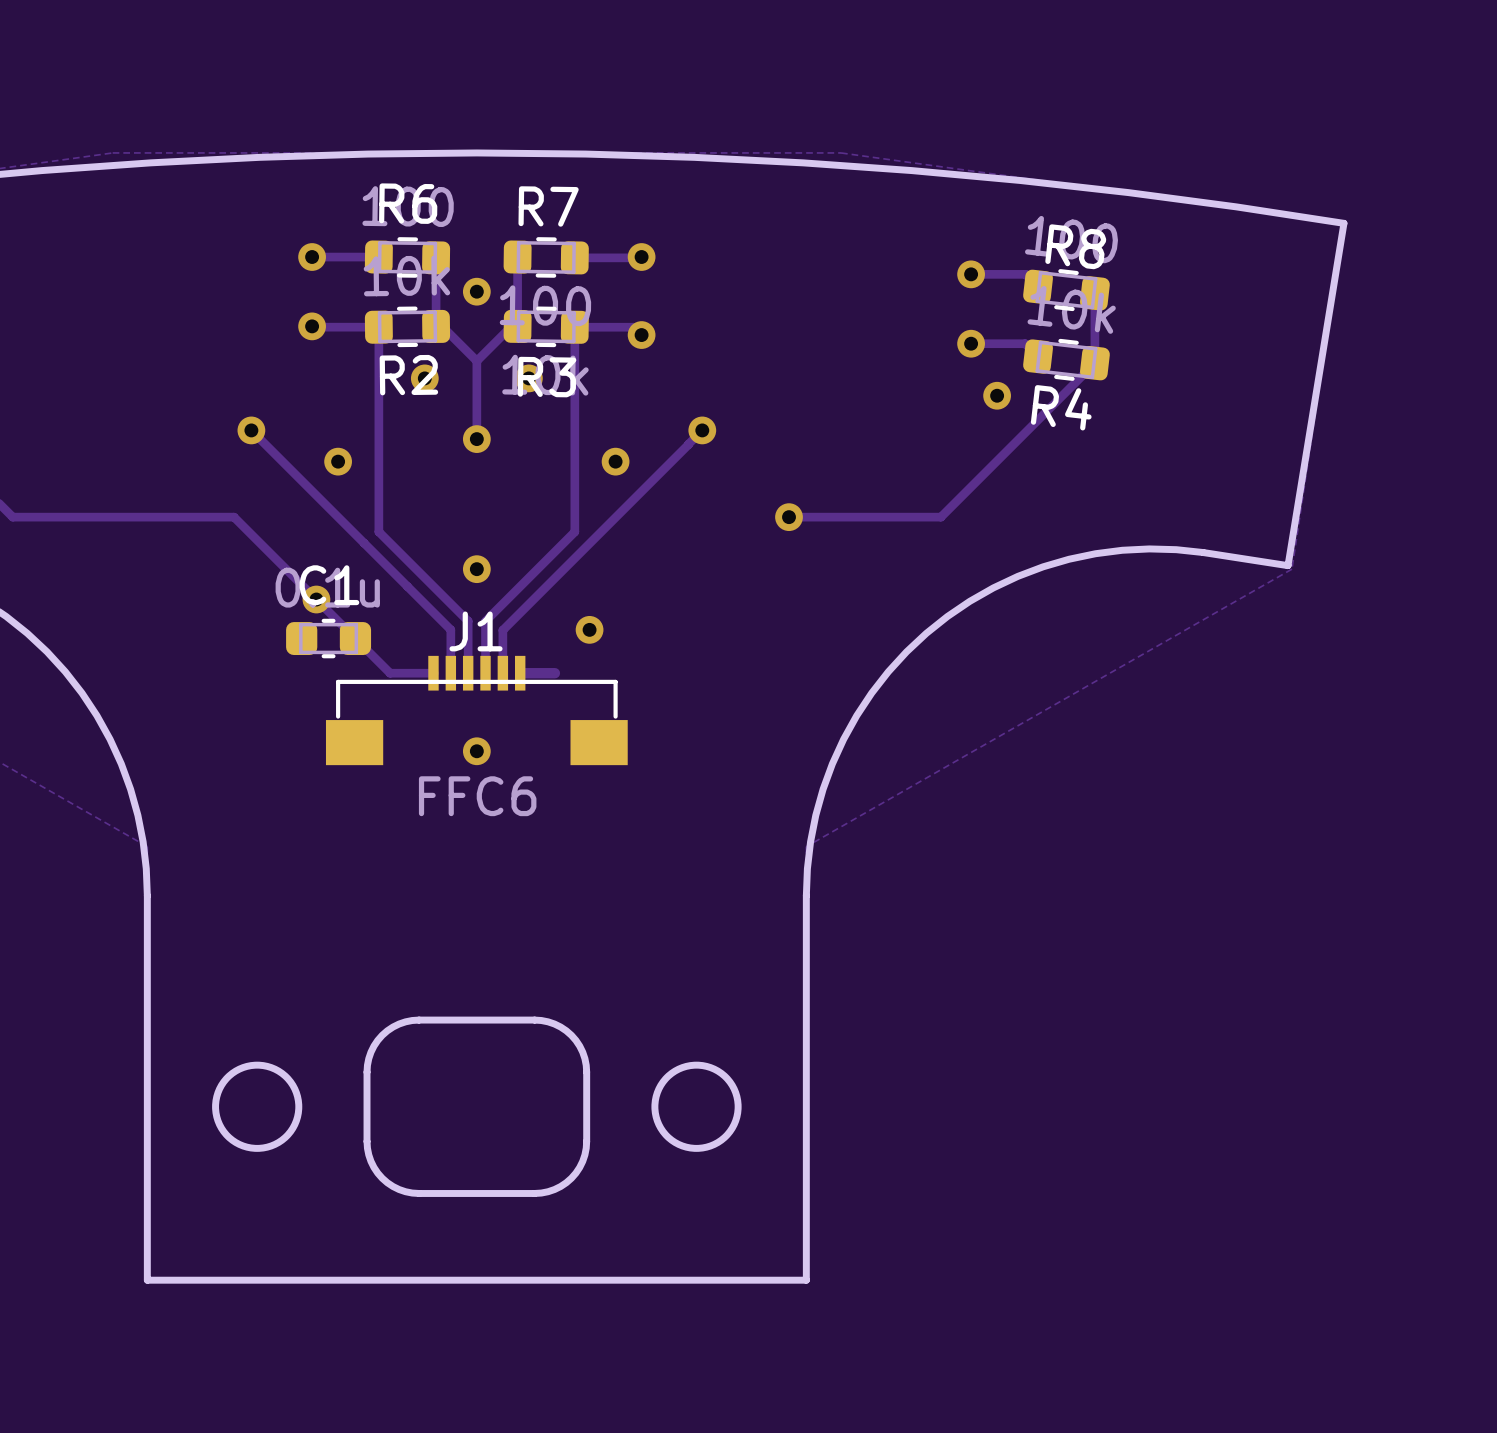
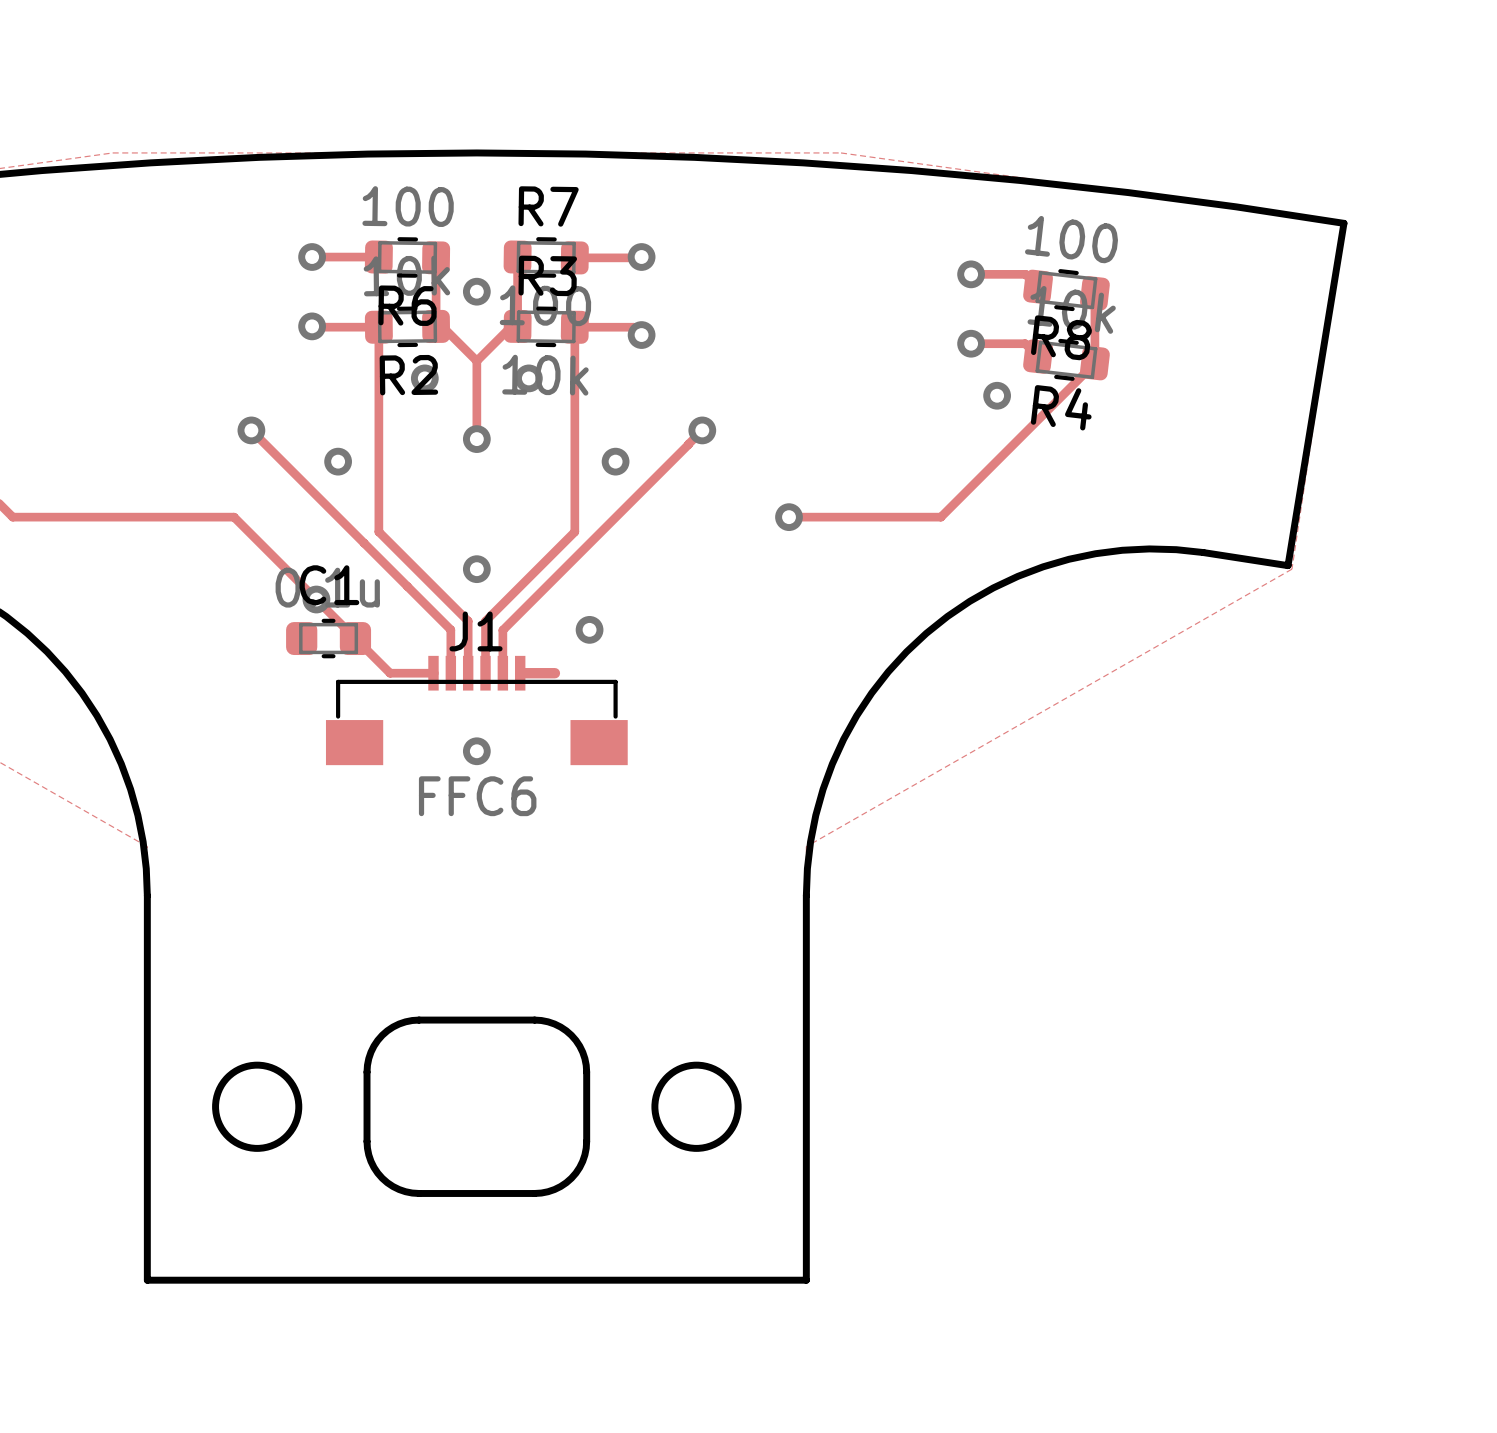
R6 name position: R6 (408, 203) -> R6 (407, 305)
R8 name position: R8 (1075, 246) -> R8 (1061, 337)
R3 name position: R3 (547, 377) -> R3 (547, 275)

